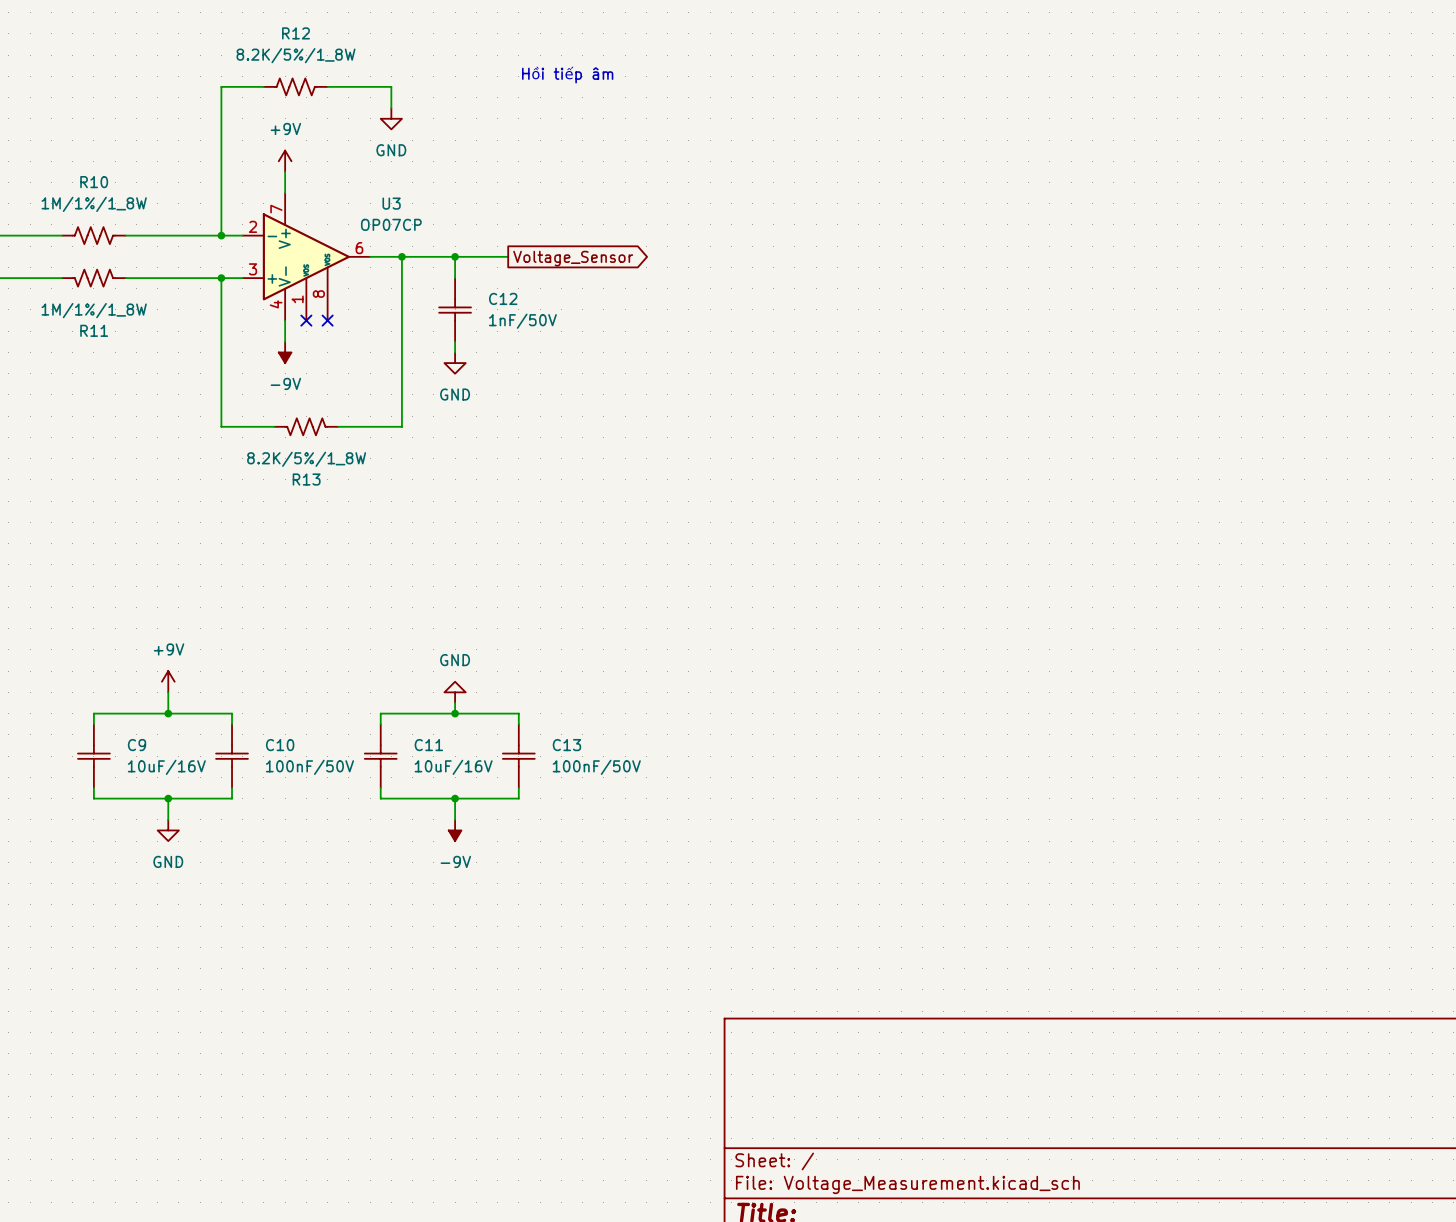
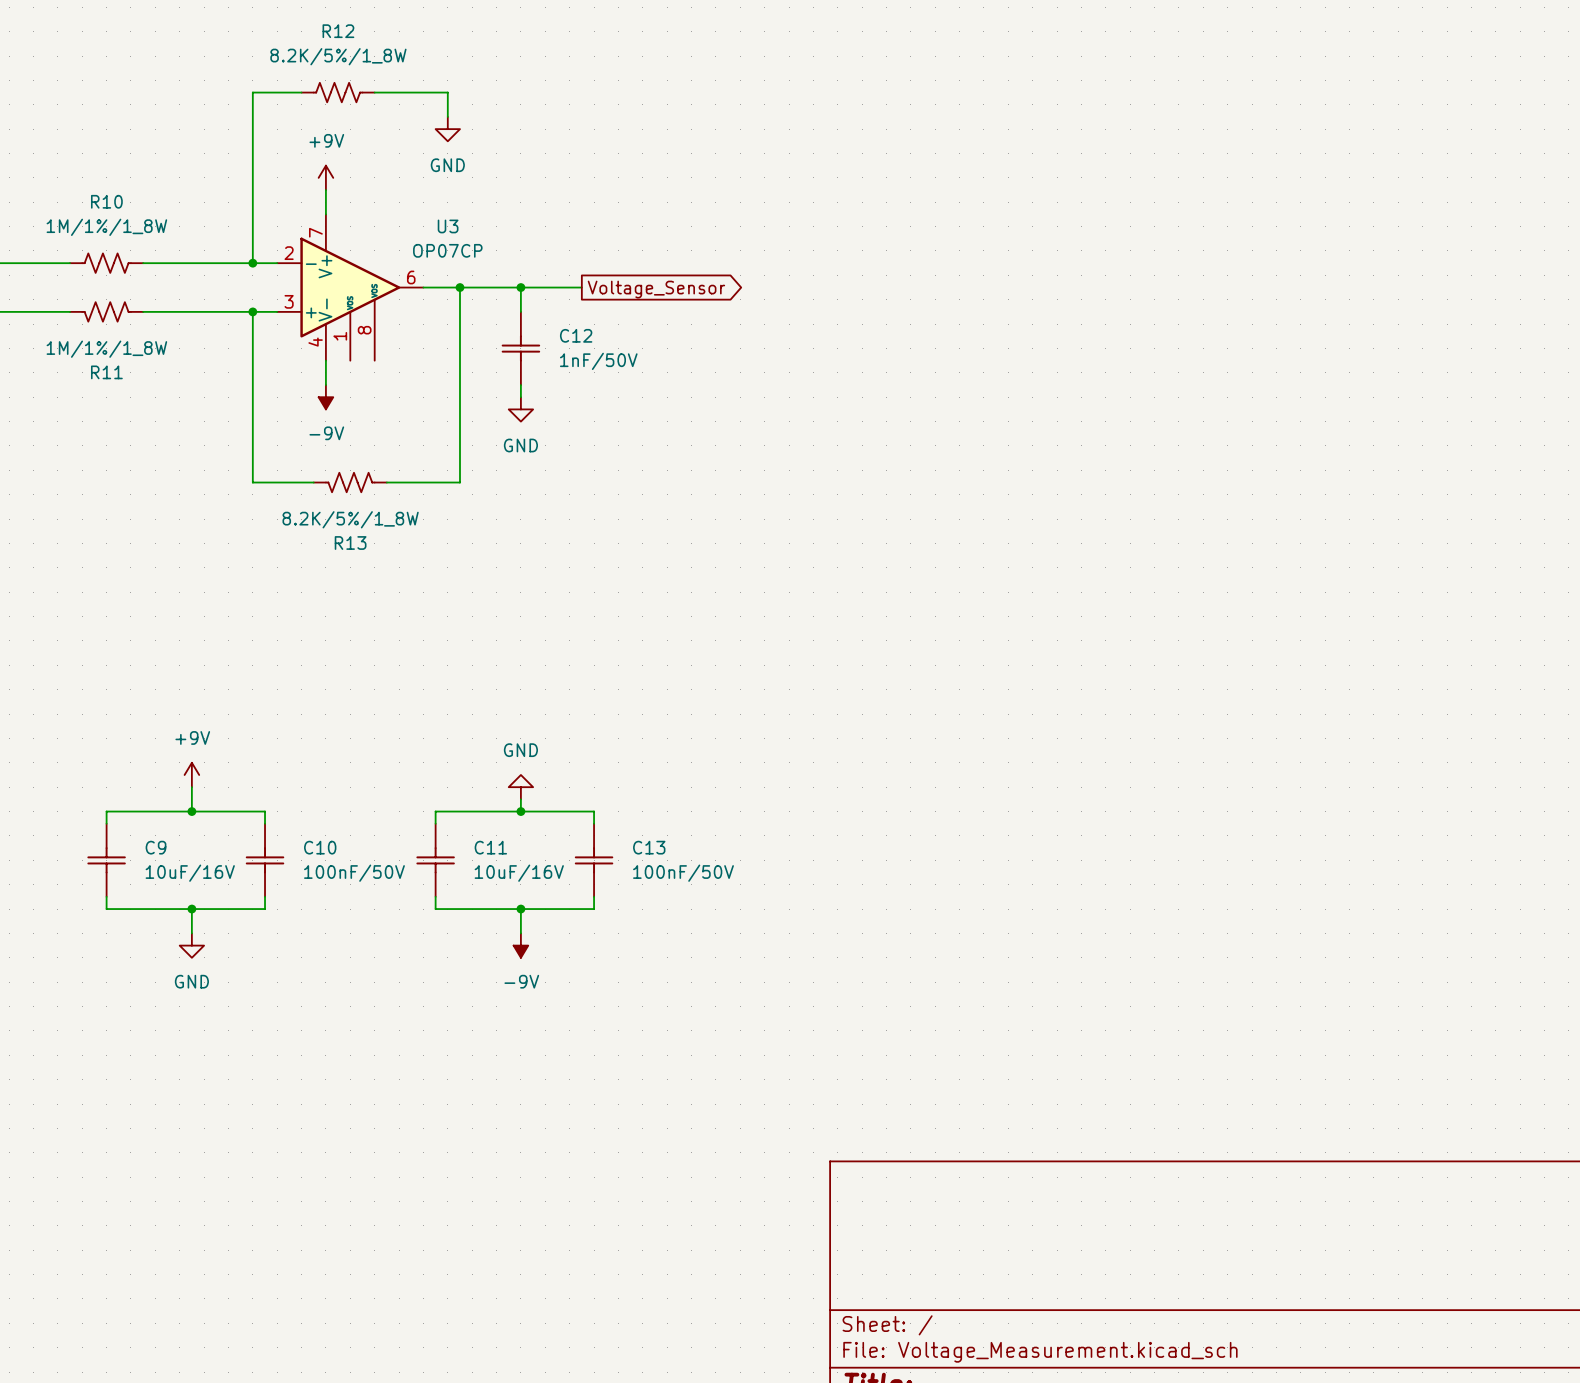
text: Hồi tiếp âm (567, 74) -> none
no-connect mark: (306, 320) -> none
no-connect mark: (327, 320) -> none

